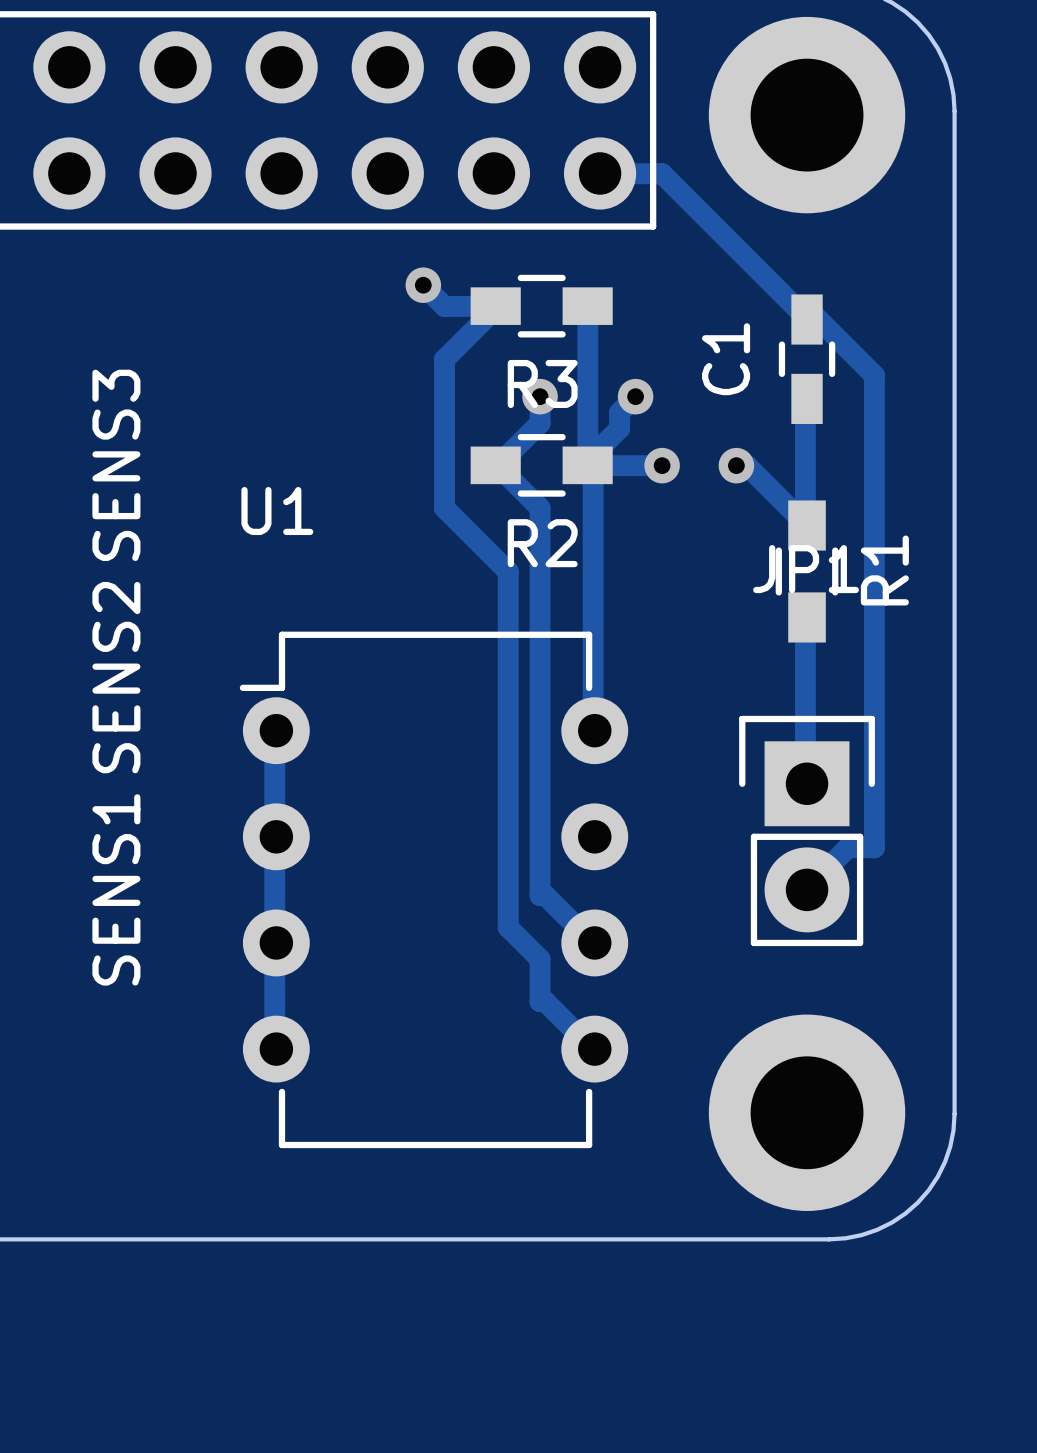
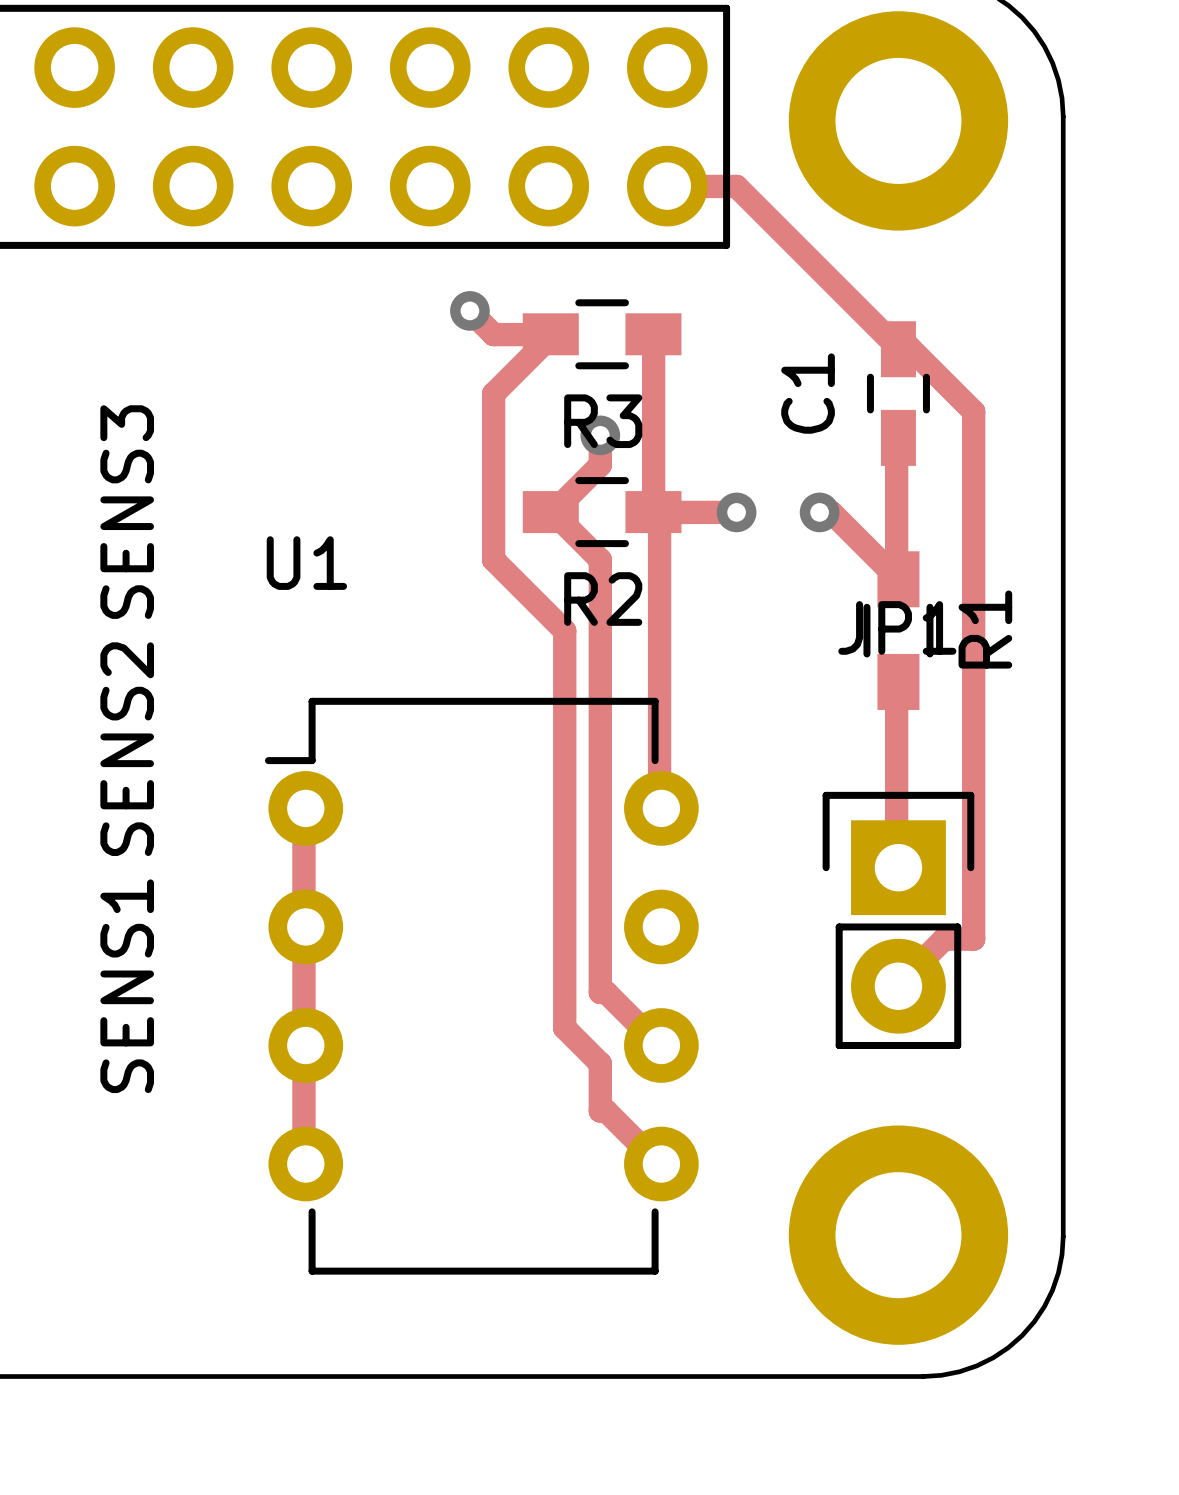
track: (635, 396) (619, 412) (619, 428) (587, 460) -> none
via: (635, 396) -> none

